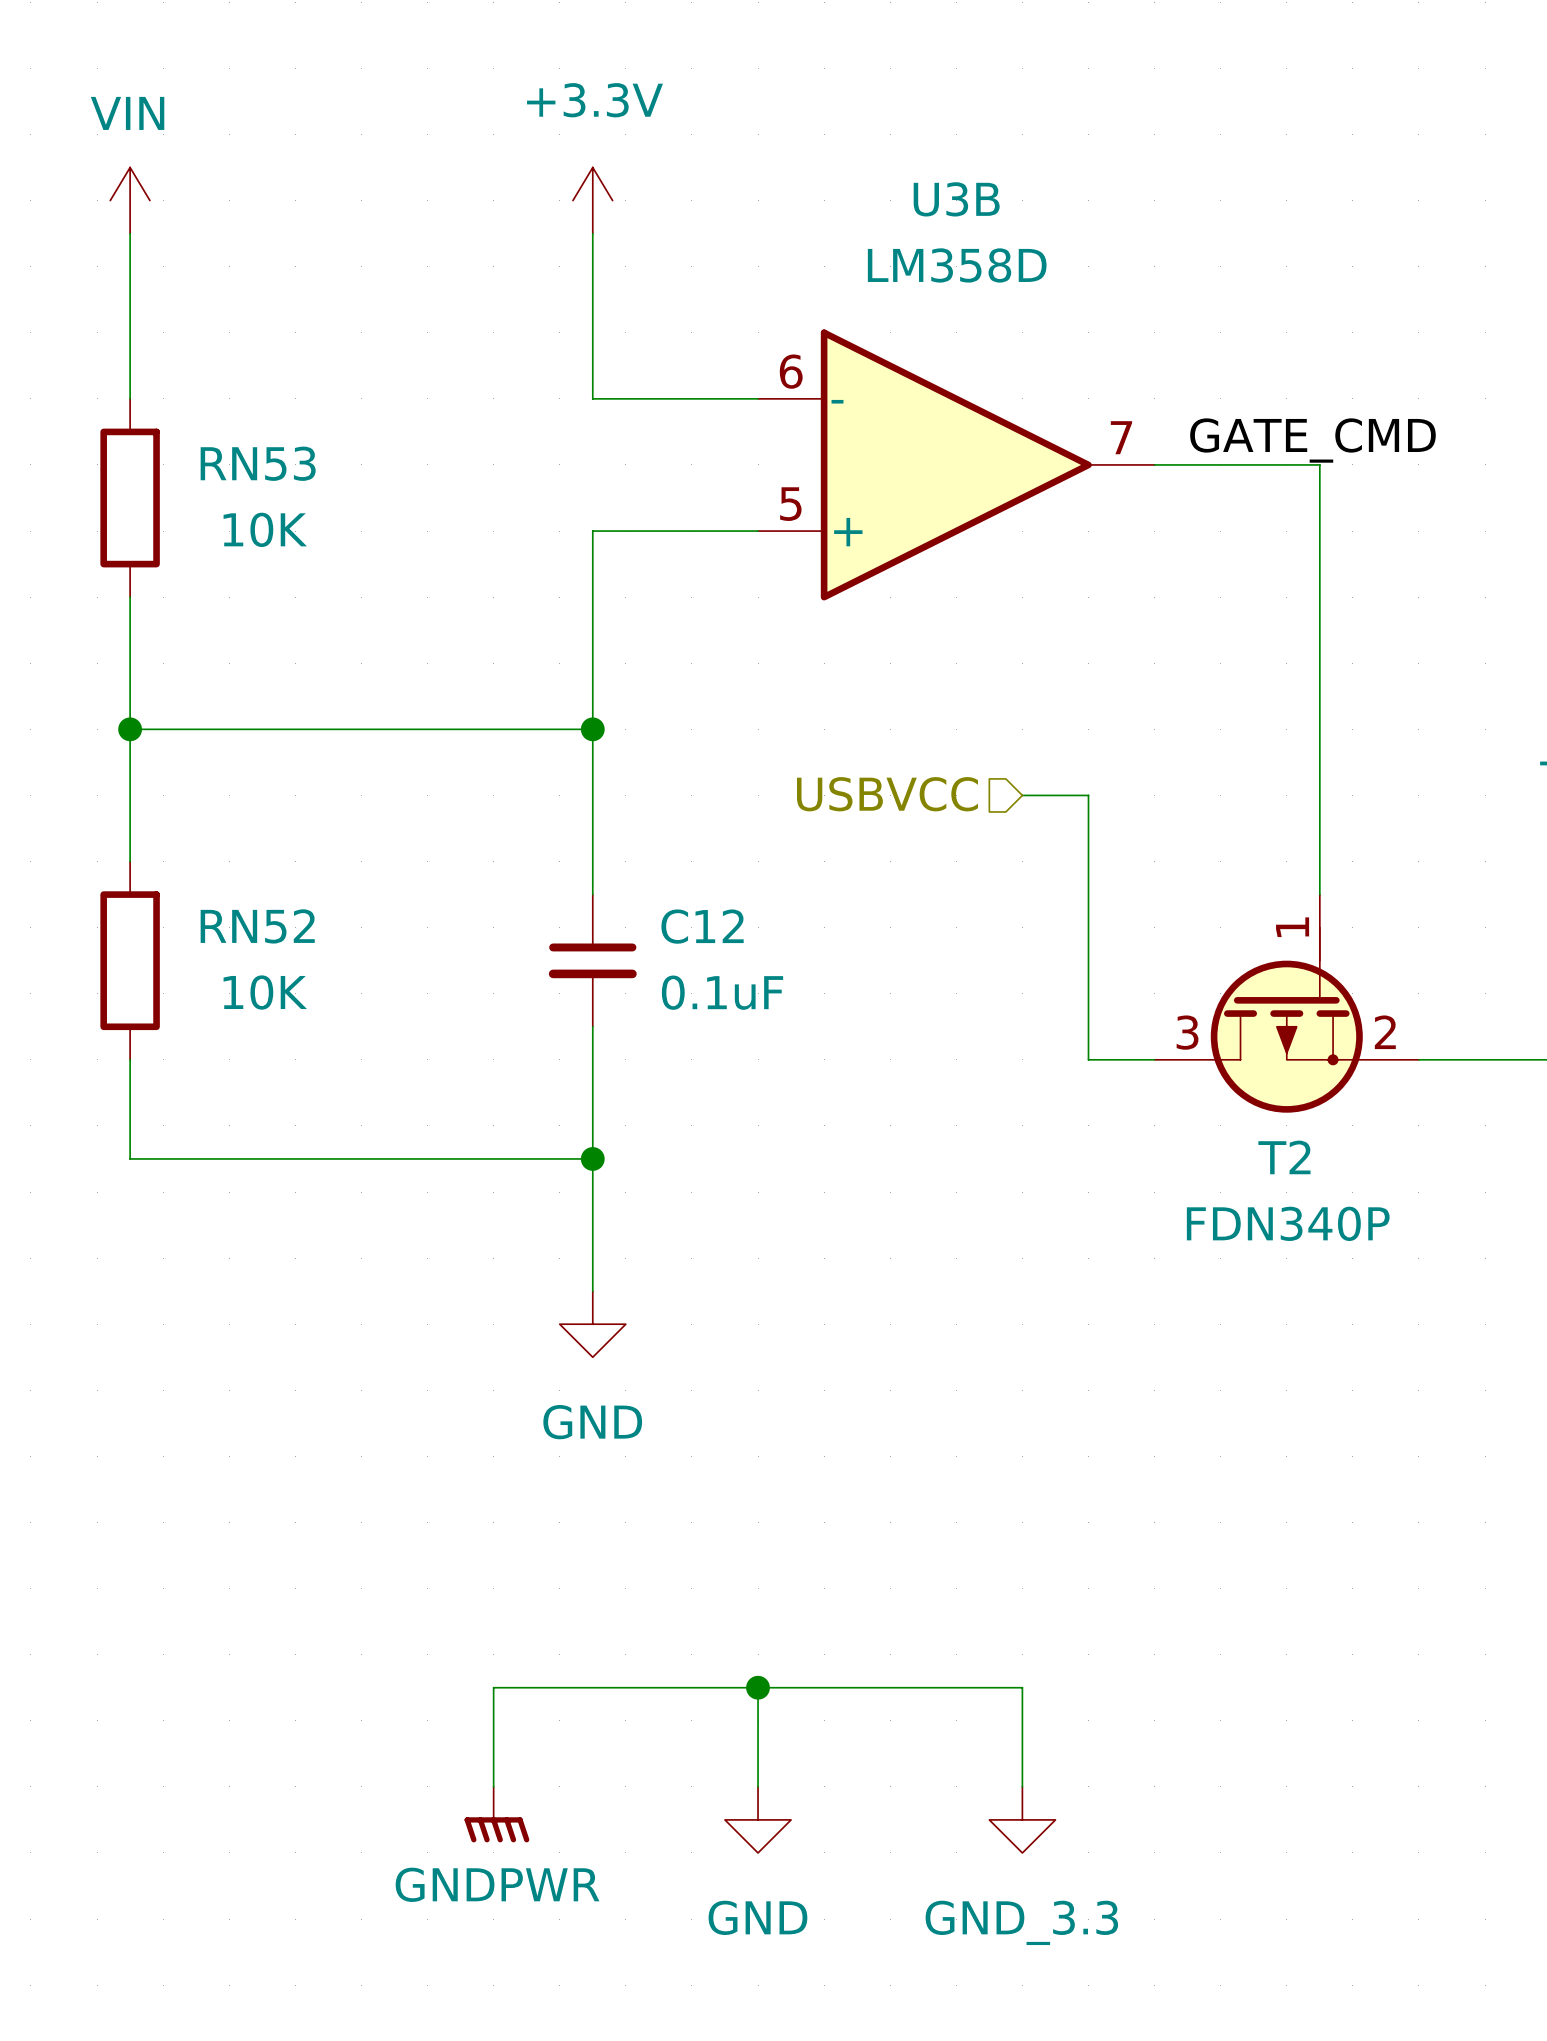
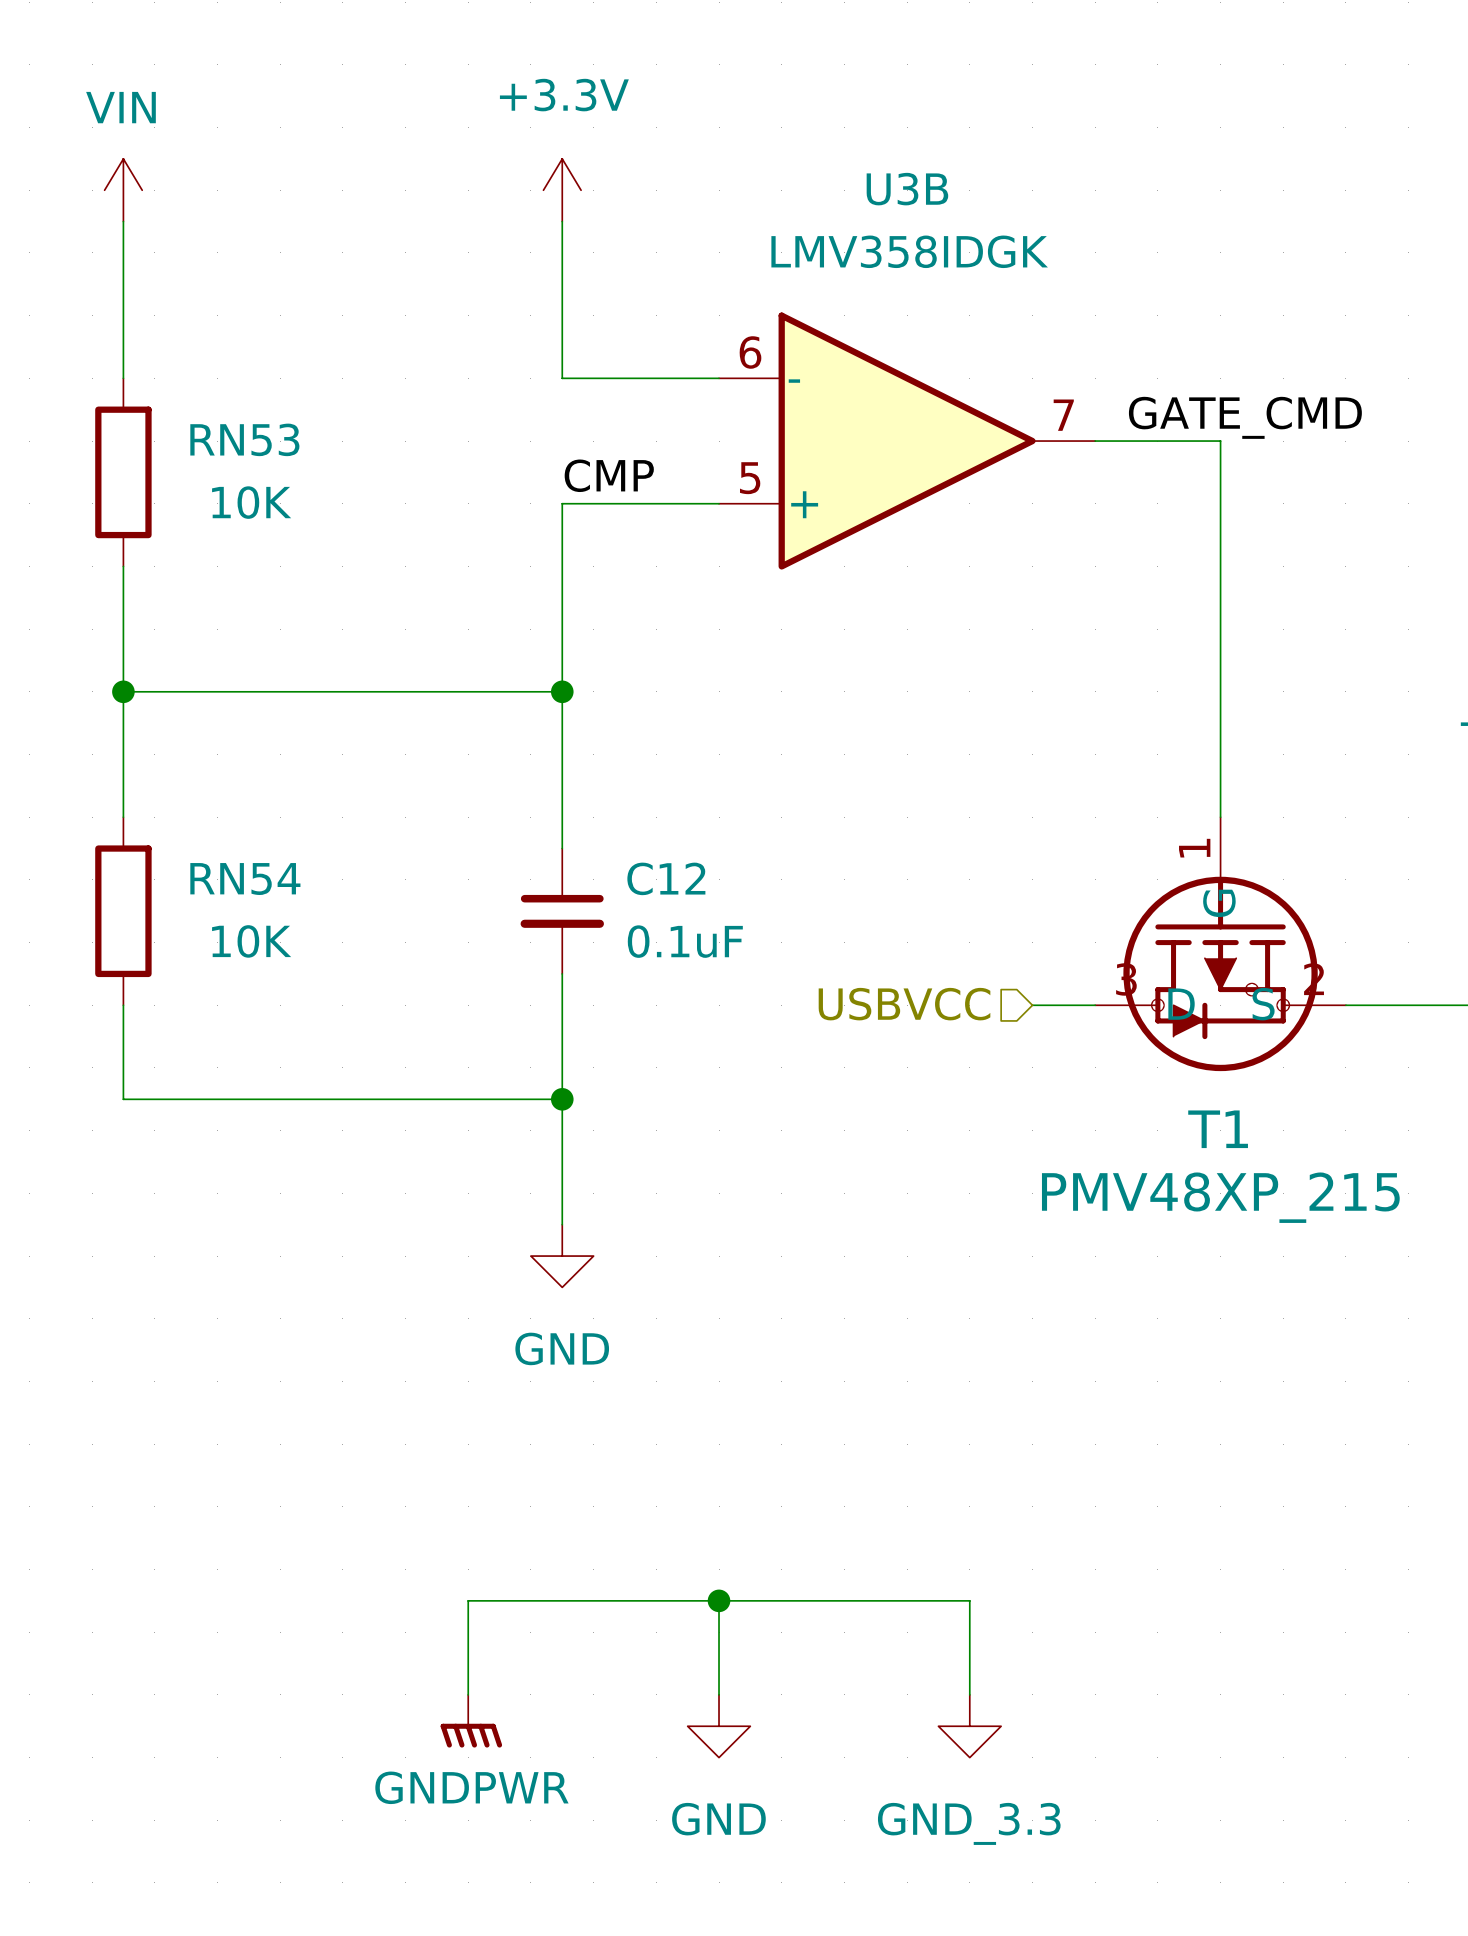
U3B value: LM358D (957, 265) -> LMV358IDGK (909, 251)
wire: (1286, 464) (1319, 464) (1319, 894) -> (1220, 441) (1220, 817)
label: none -> CMP (609, 475)
hierarchical label position: USBVCC (887, 794) -> USBVCC (904, 1004)
wire: (1022, 795) (1088, 795) (1088, 1059) -> none
RN52 name: RN52 (257, 926) -> RN54 (245, 879)
T1: none -> PMV48XP_215 (1220, 944)
T2: FDN340P (1286, 1003) -> none

